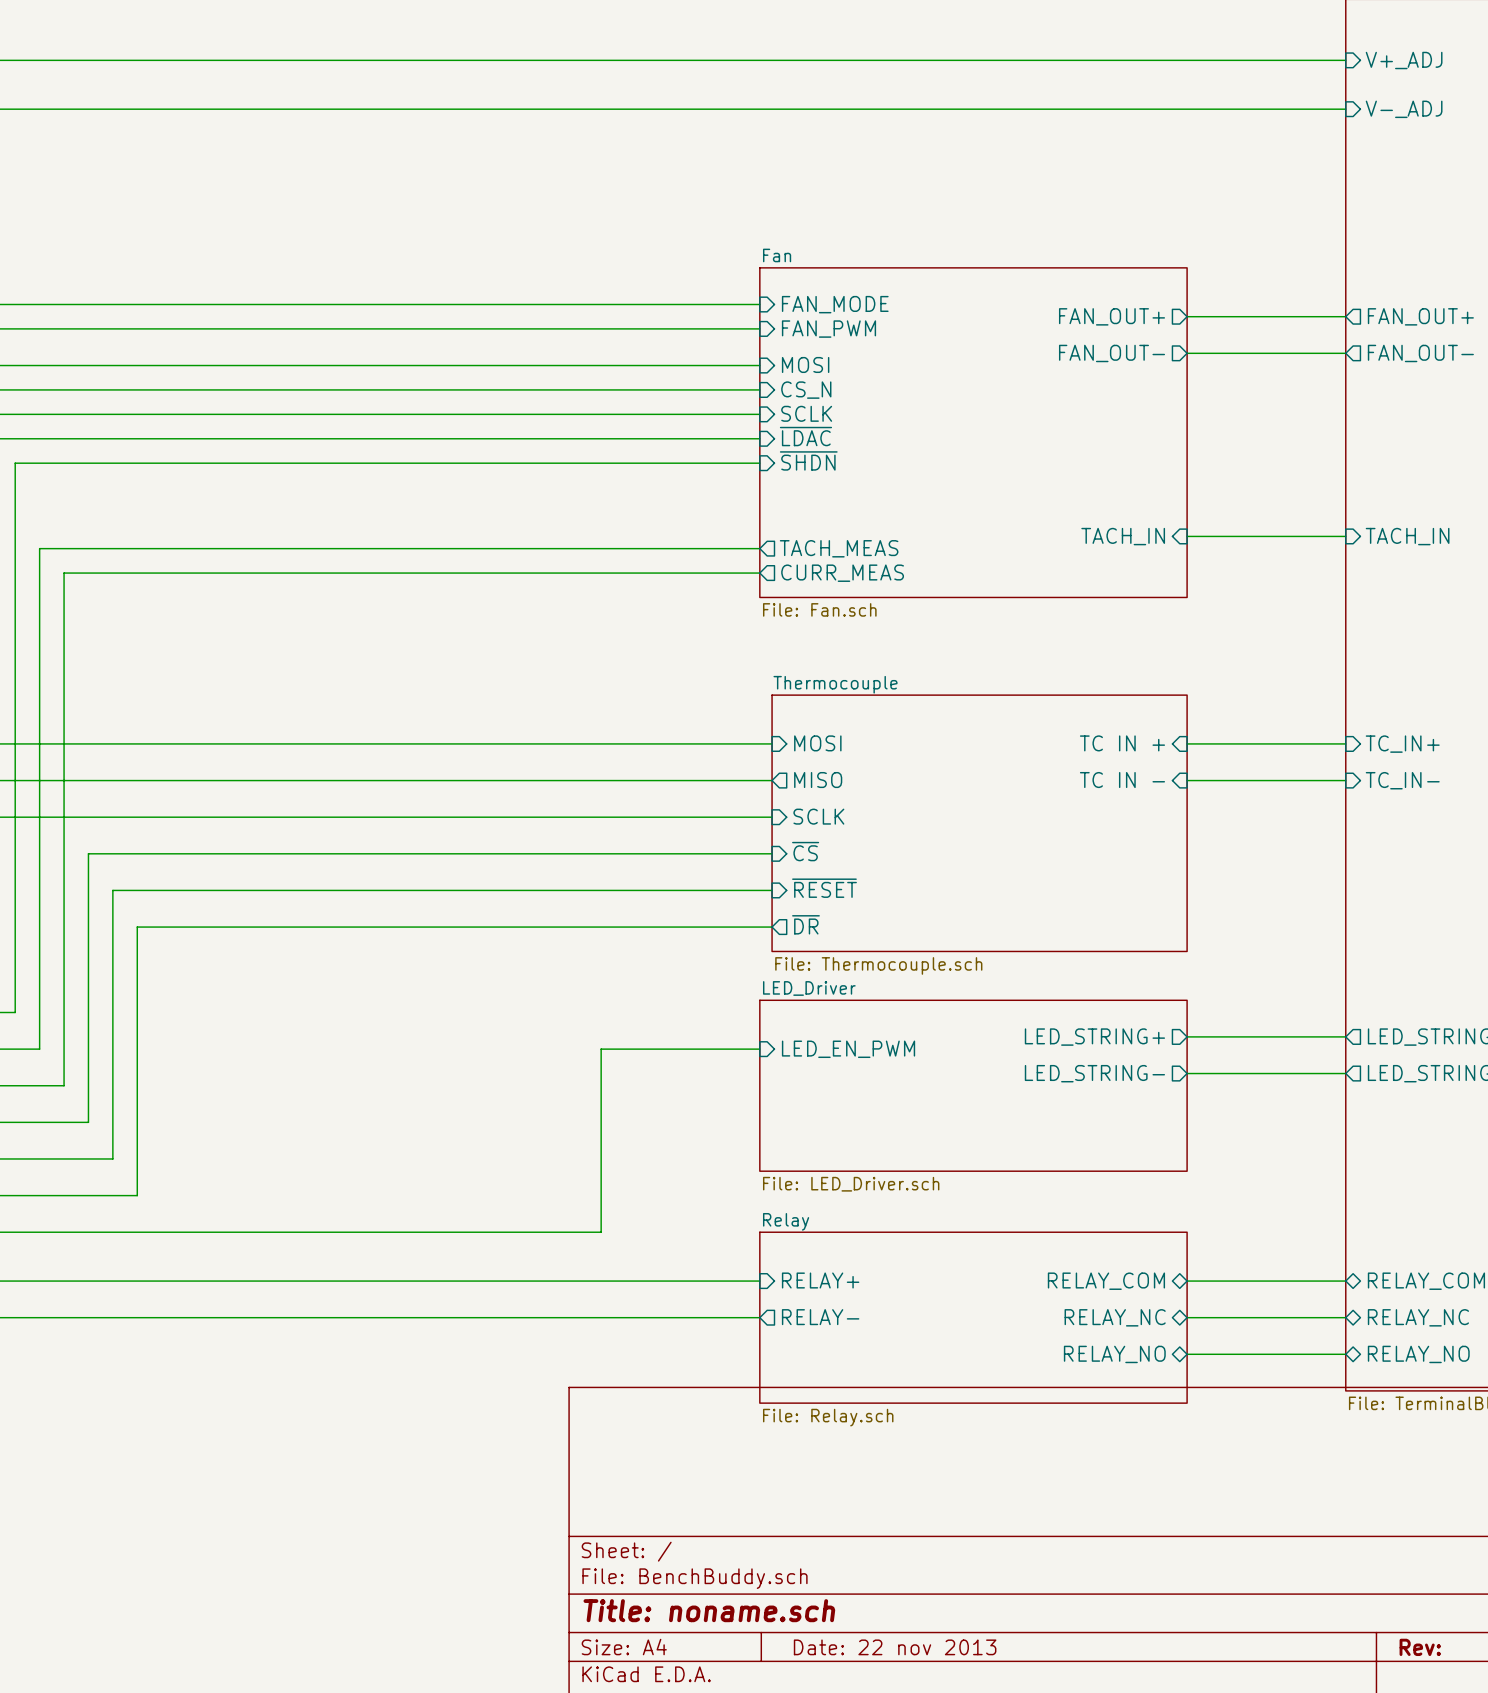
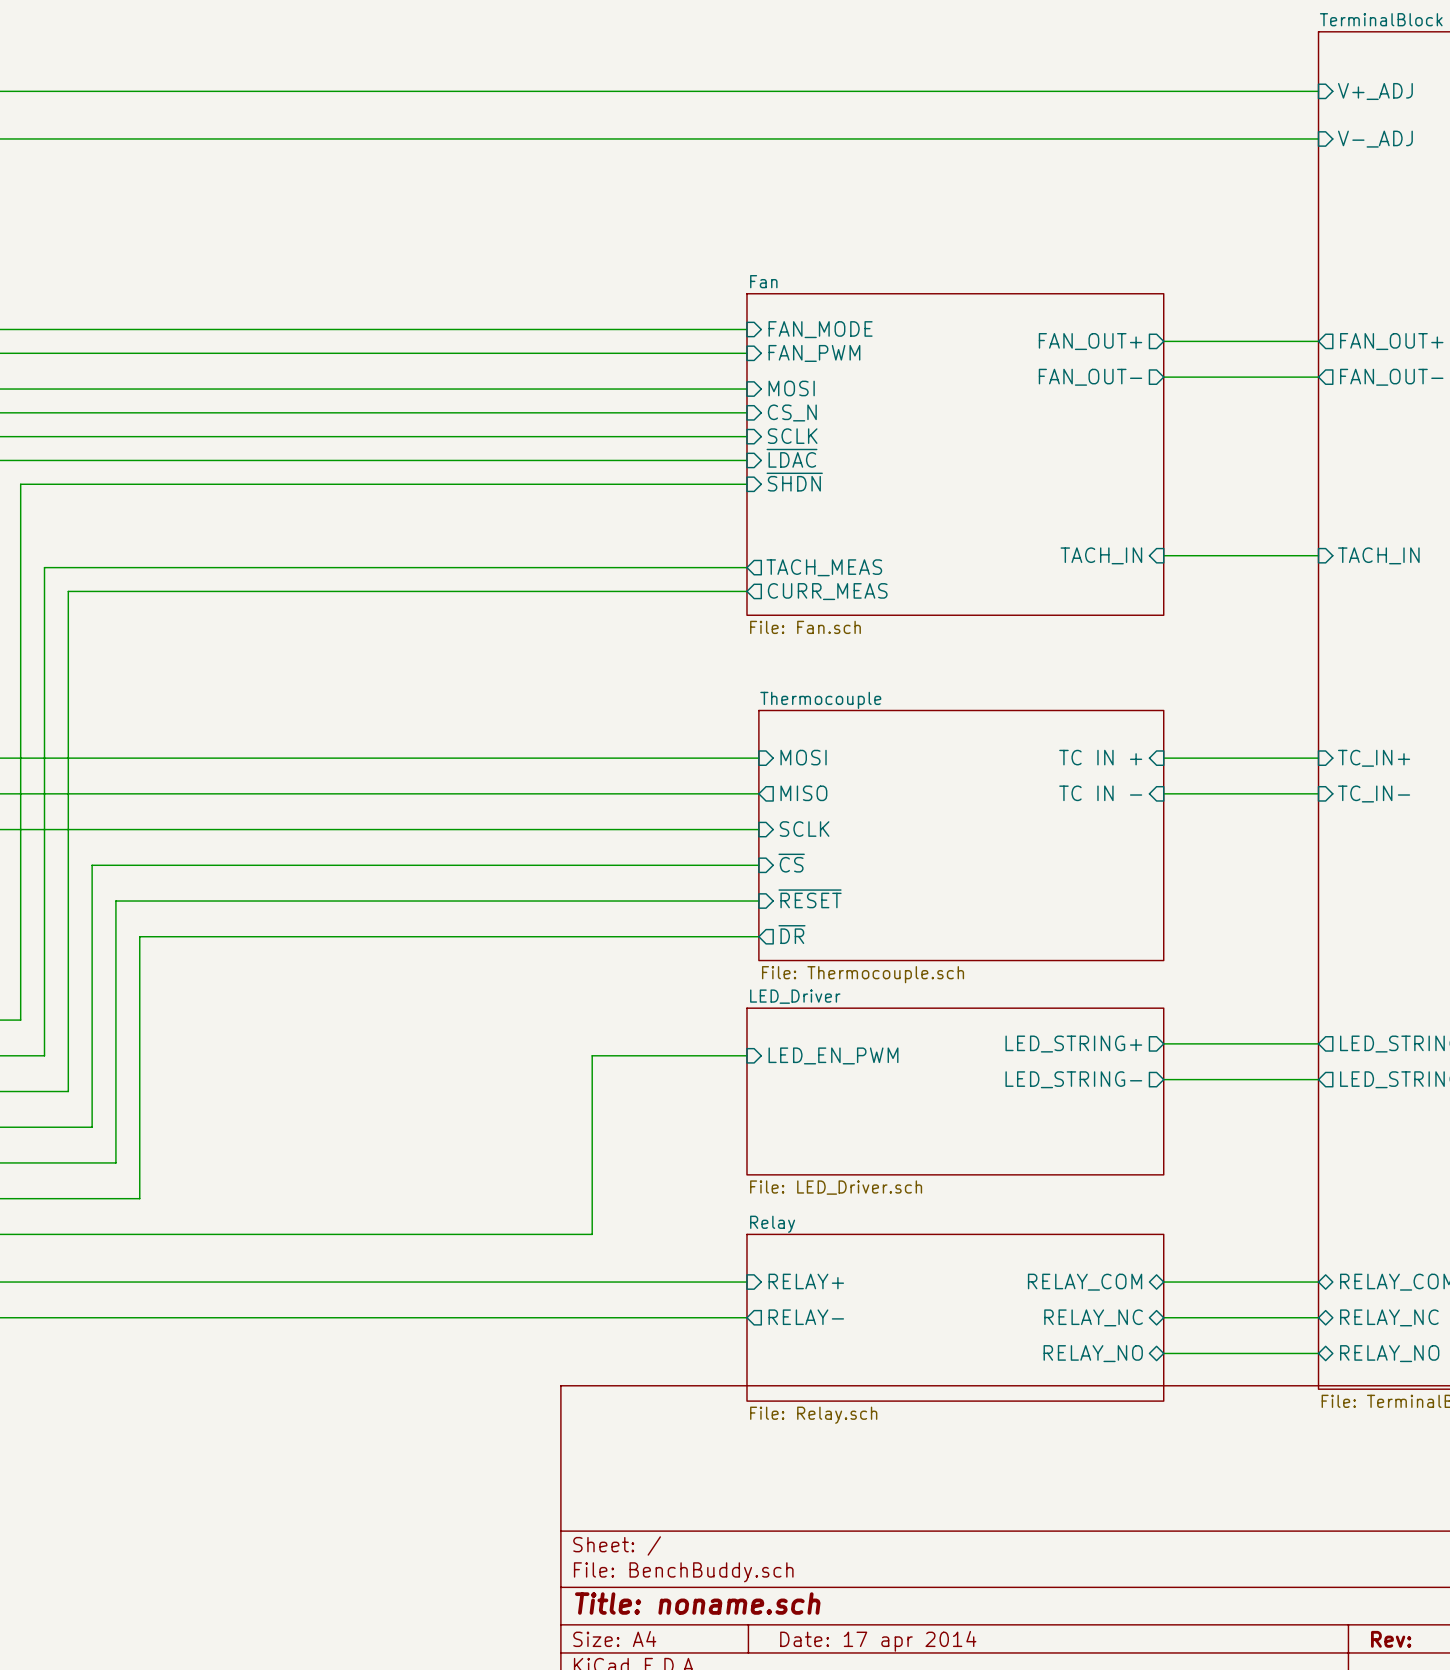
title block: Date: 22 nov 2013 (895, 1647) -> Date: 17 apr 2014 (878, 1641)

